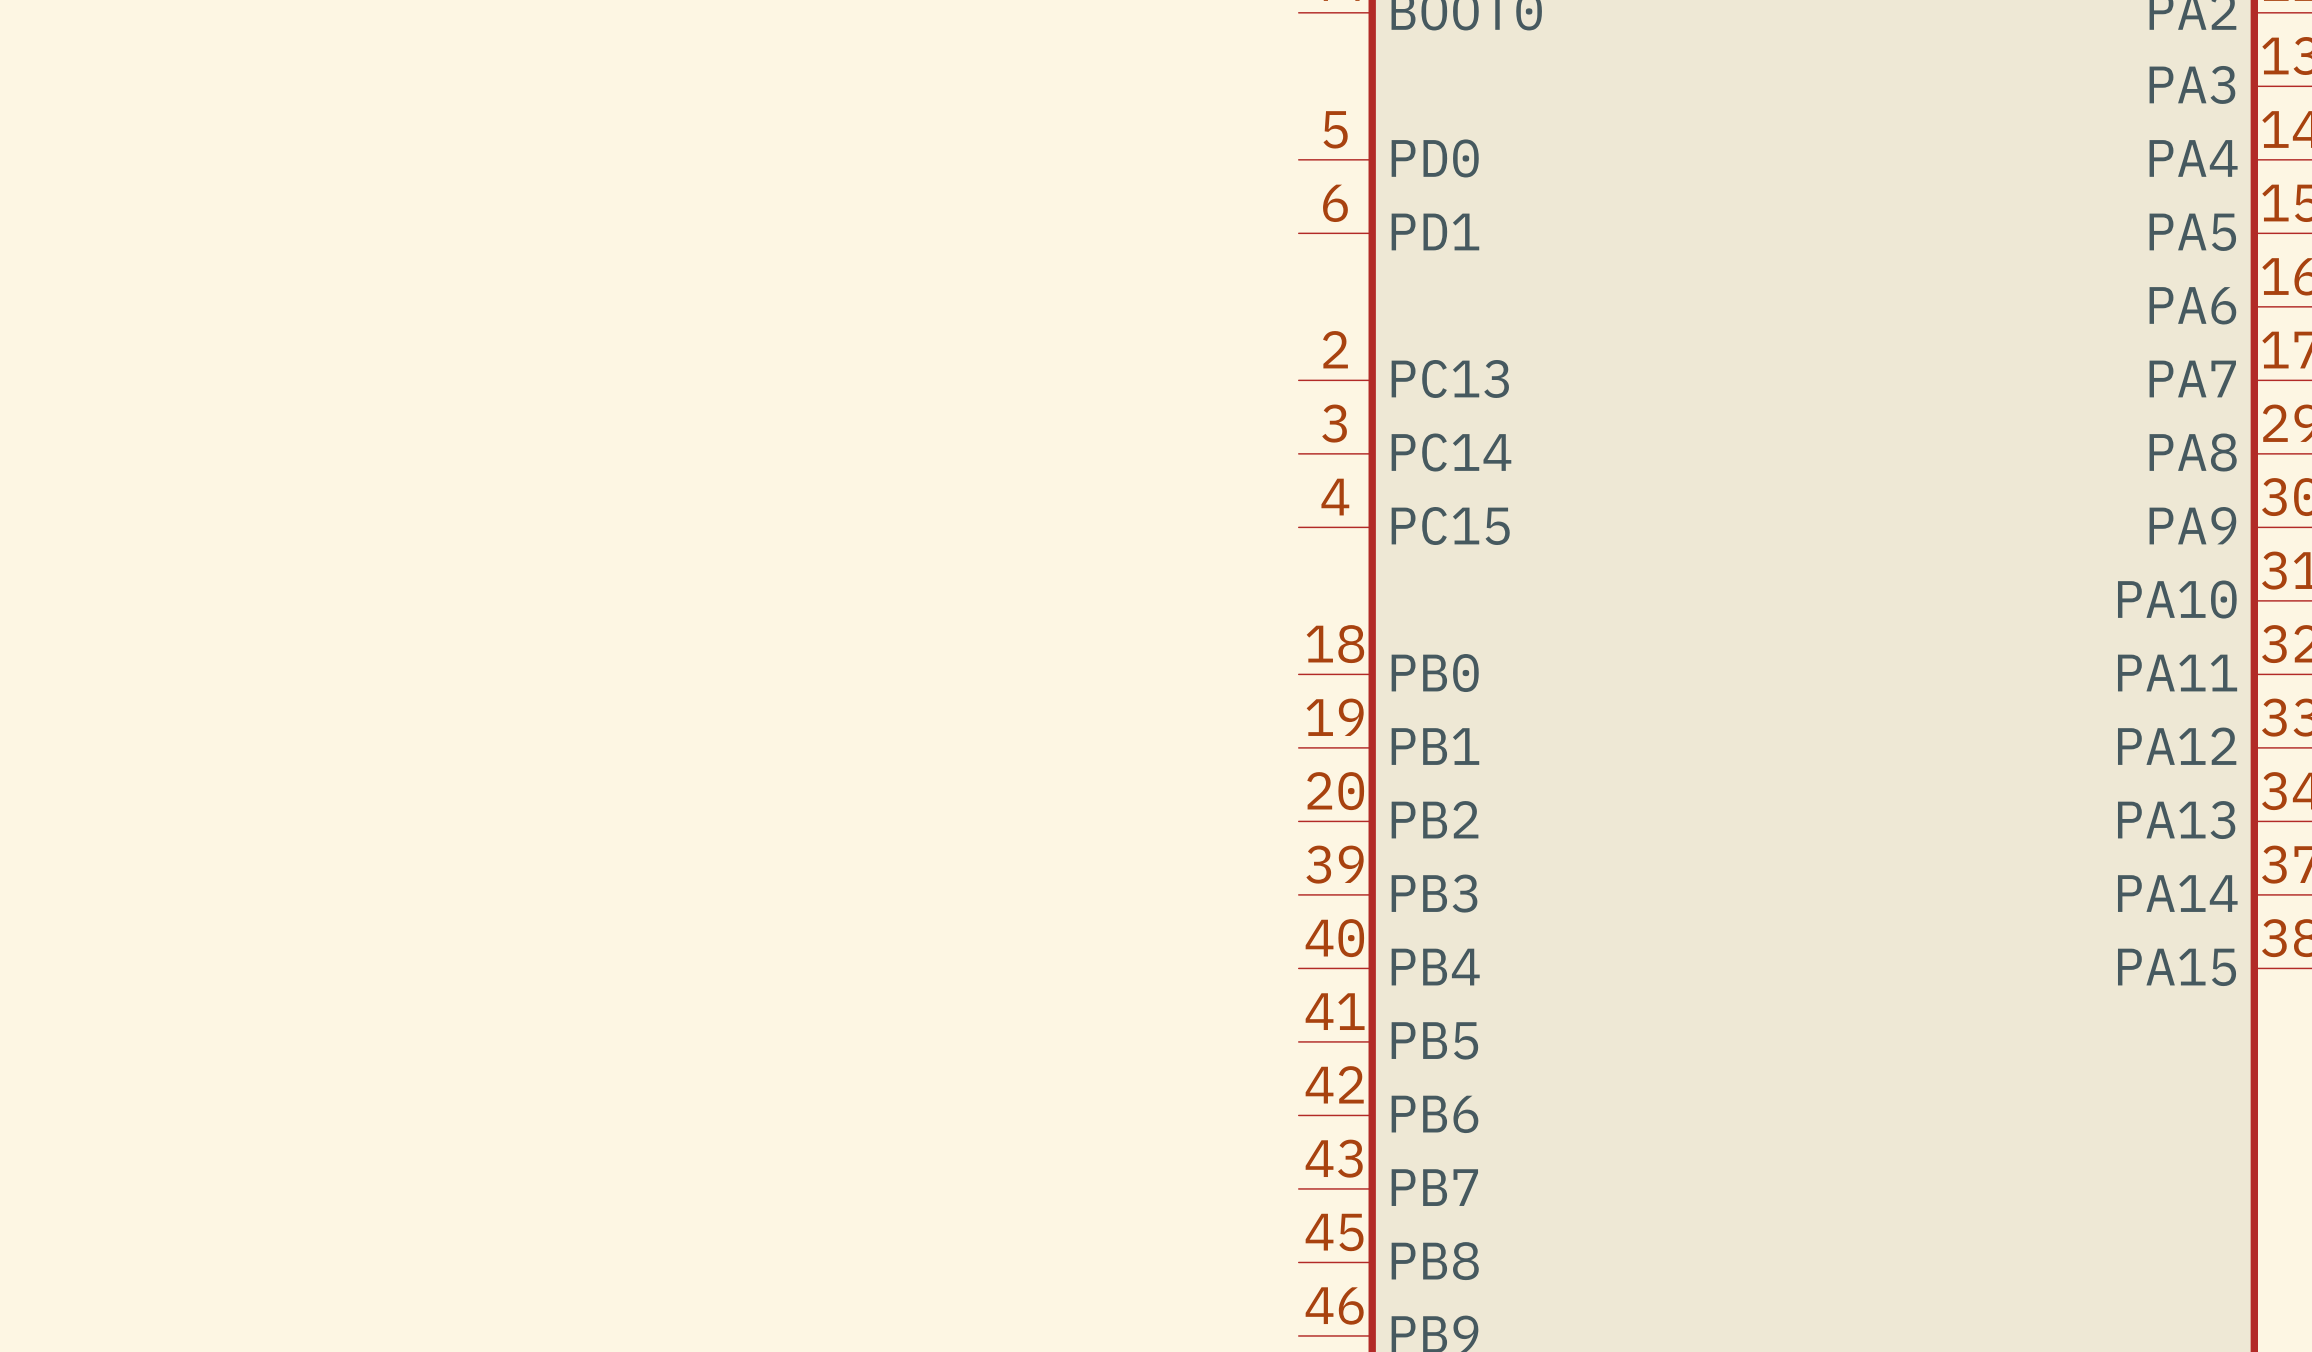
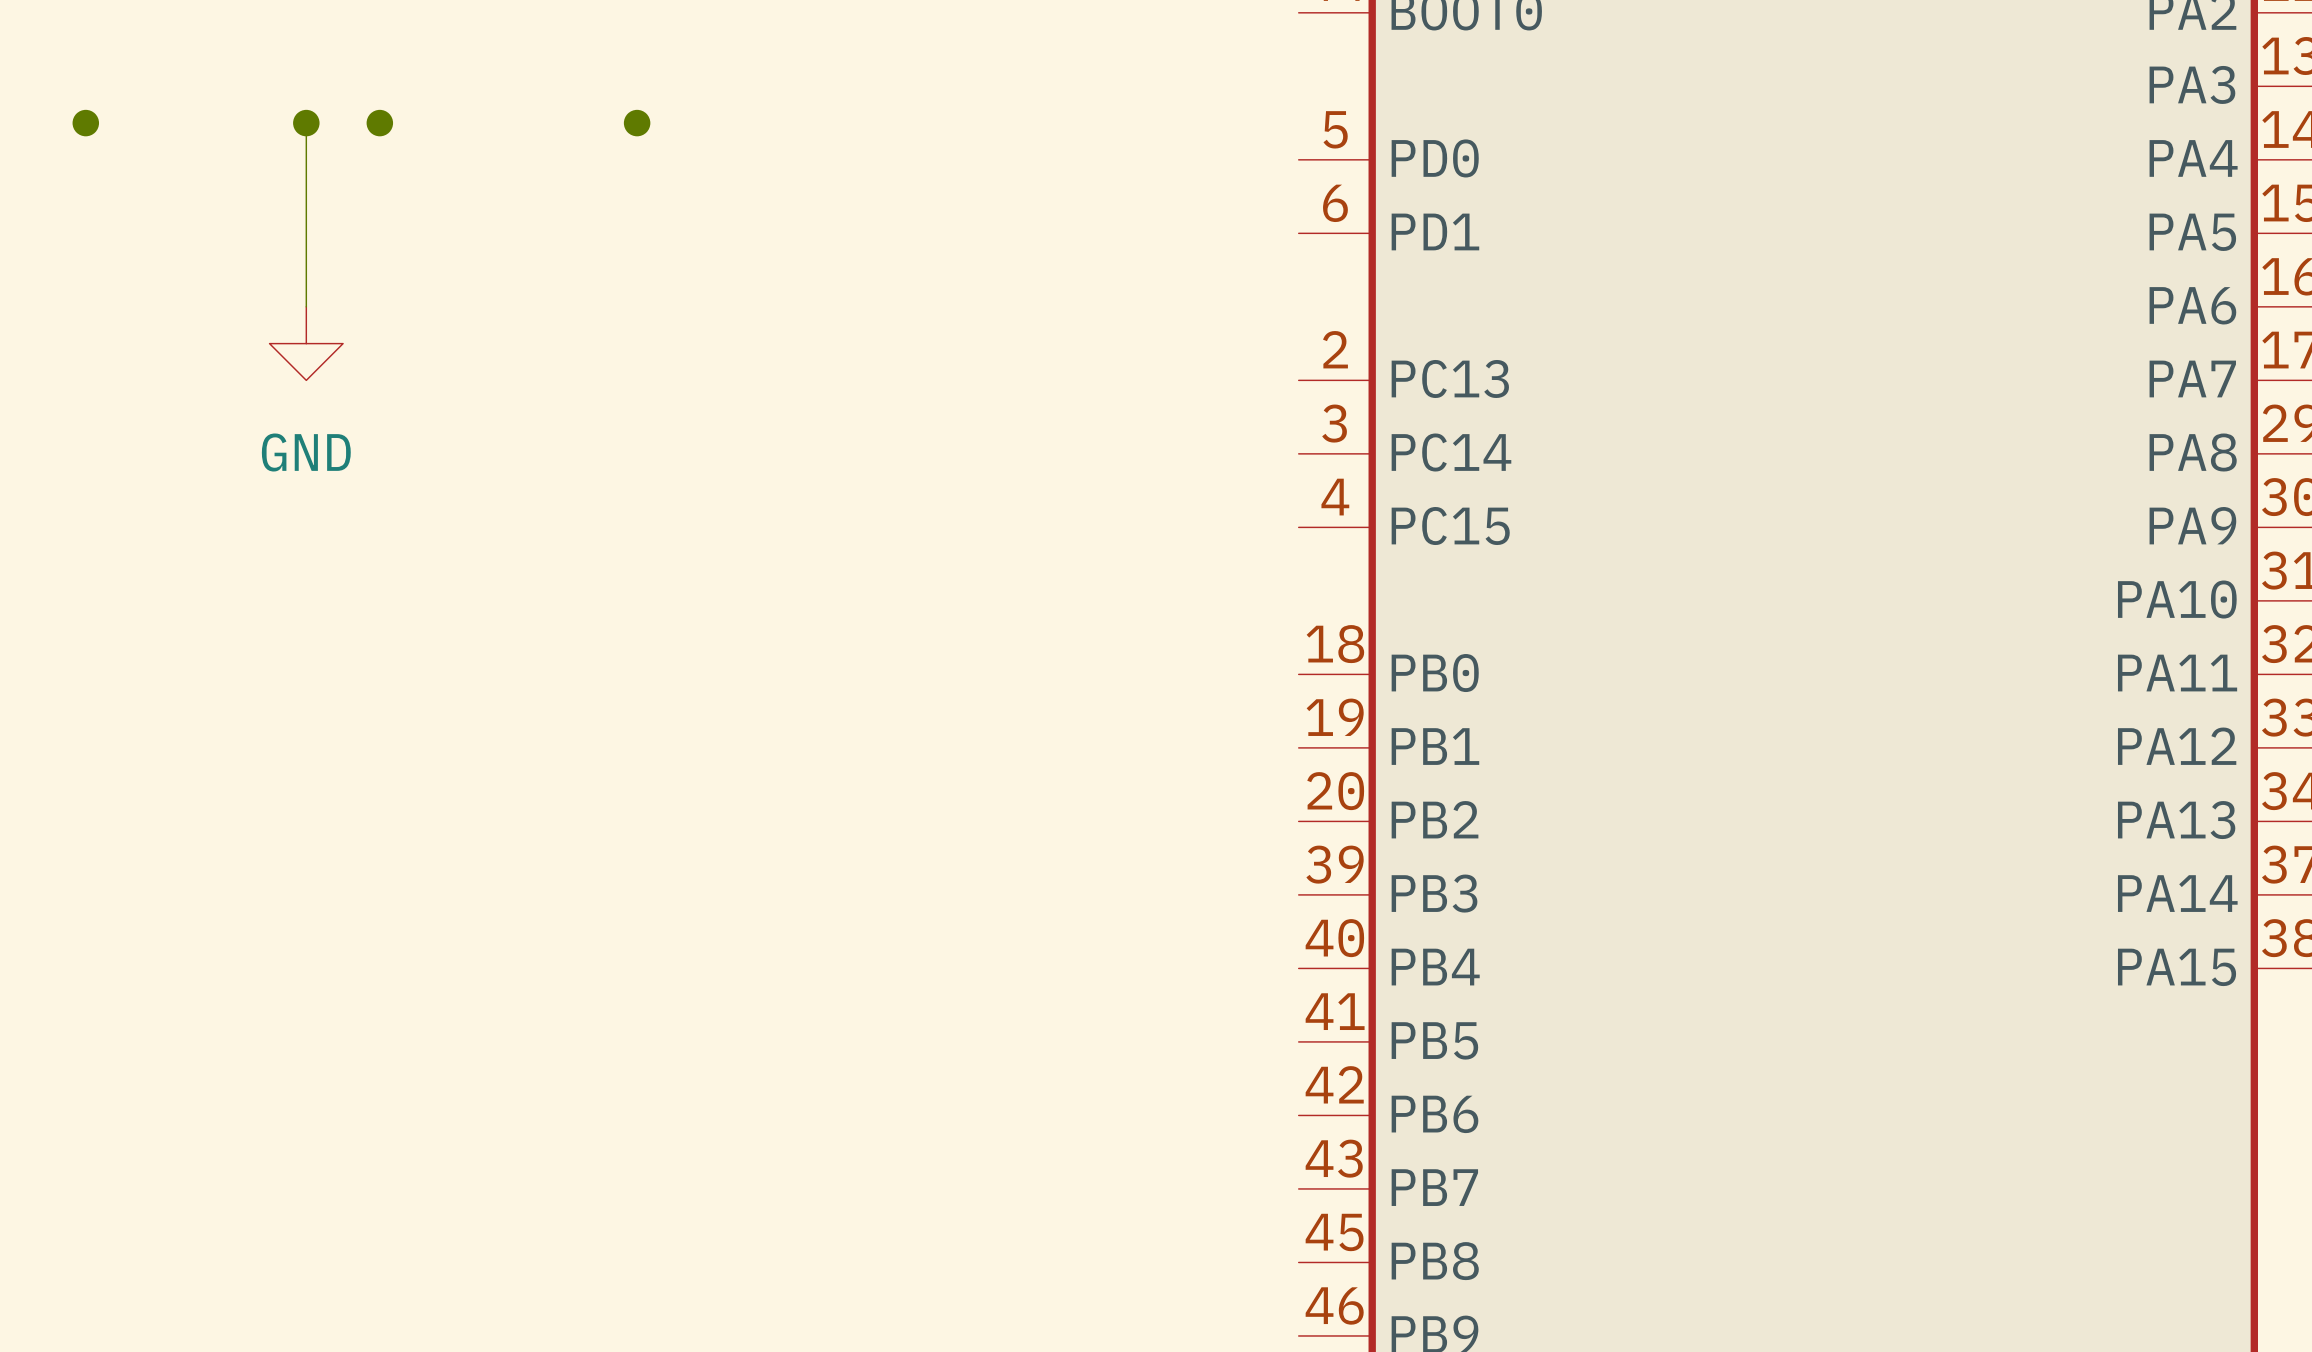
junction: none -> (85, 123)
wire: none -> (306, 123) (306, 306)
junction: none -> (306, 123)
junction: none -> (379, 123)
junction: none -> (637, 123)
power symbol: none -> GND (306, 343)

